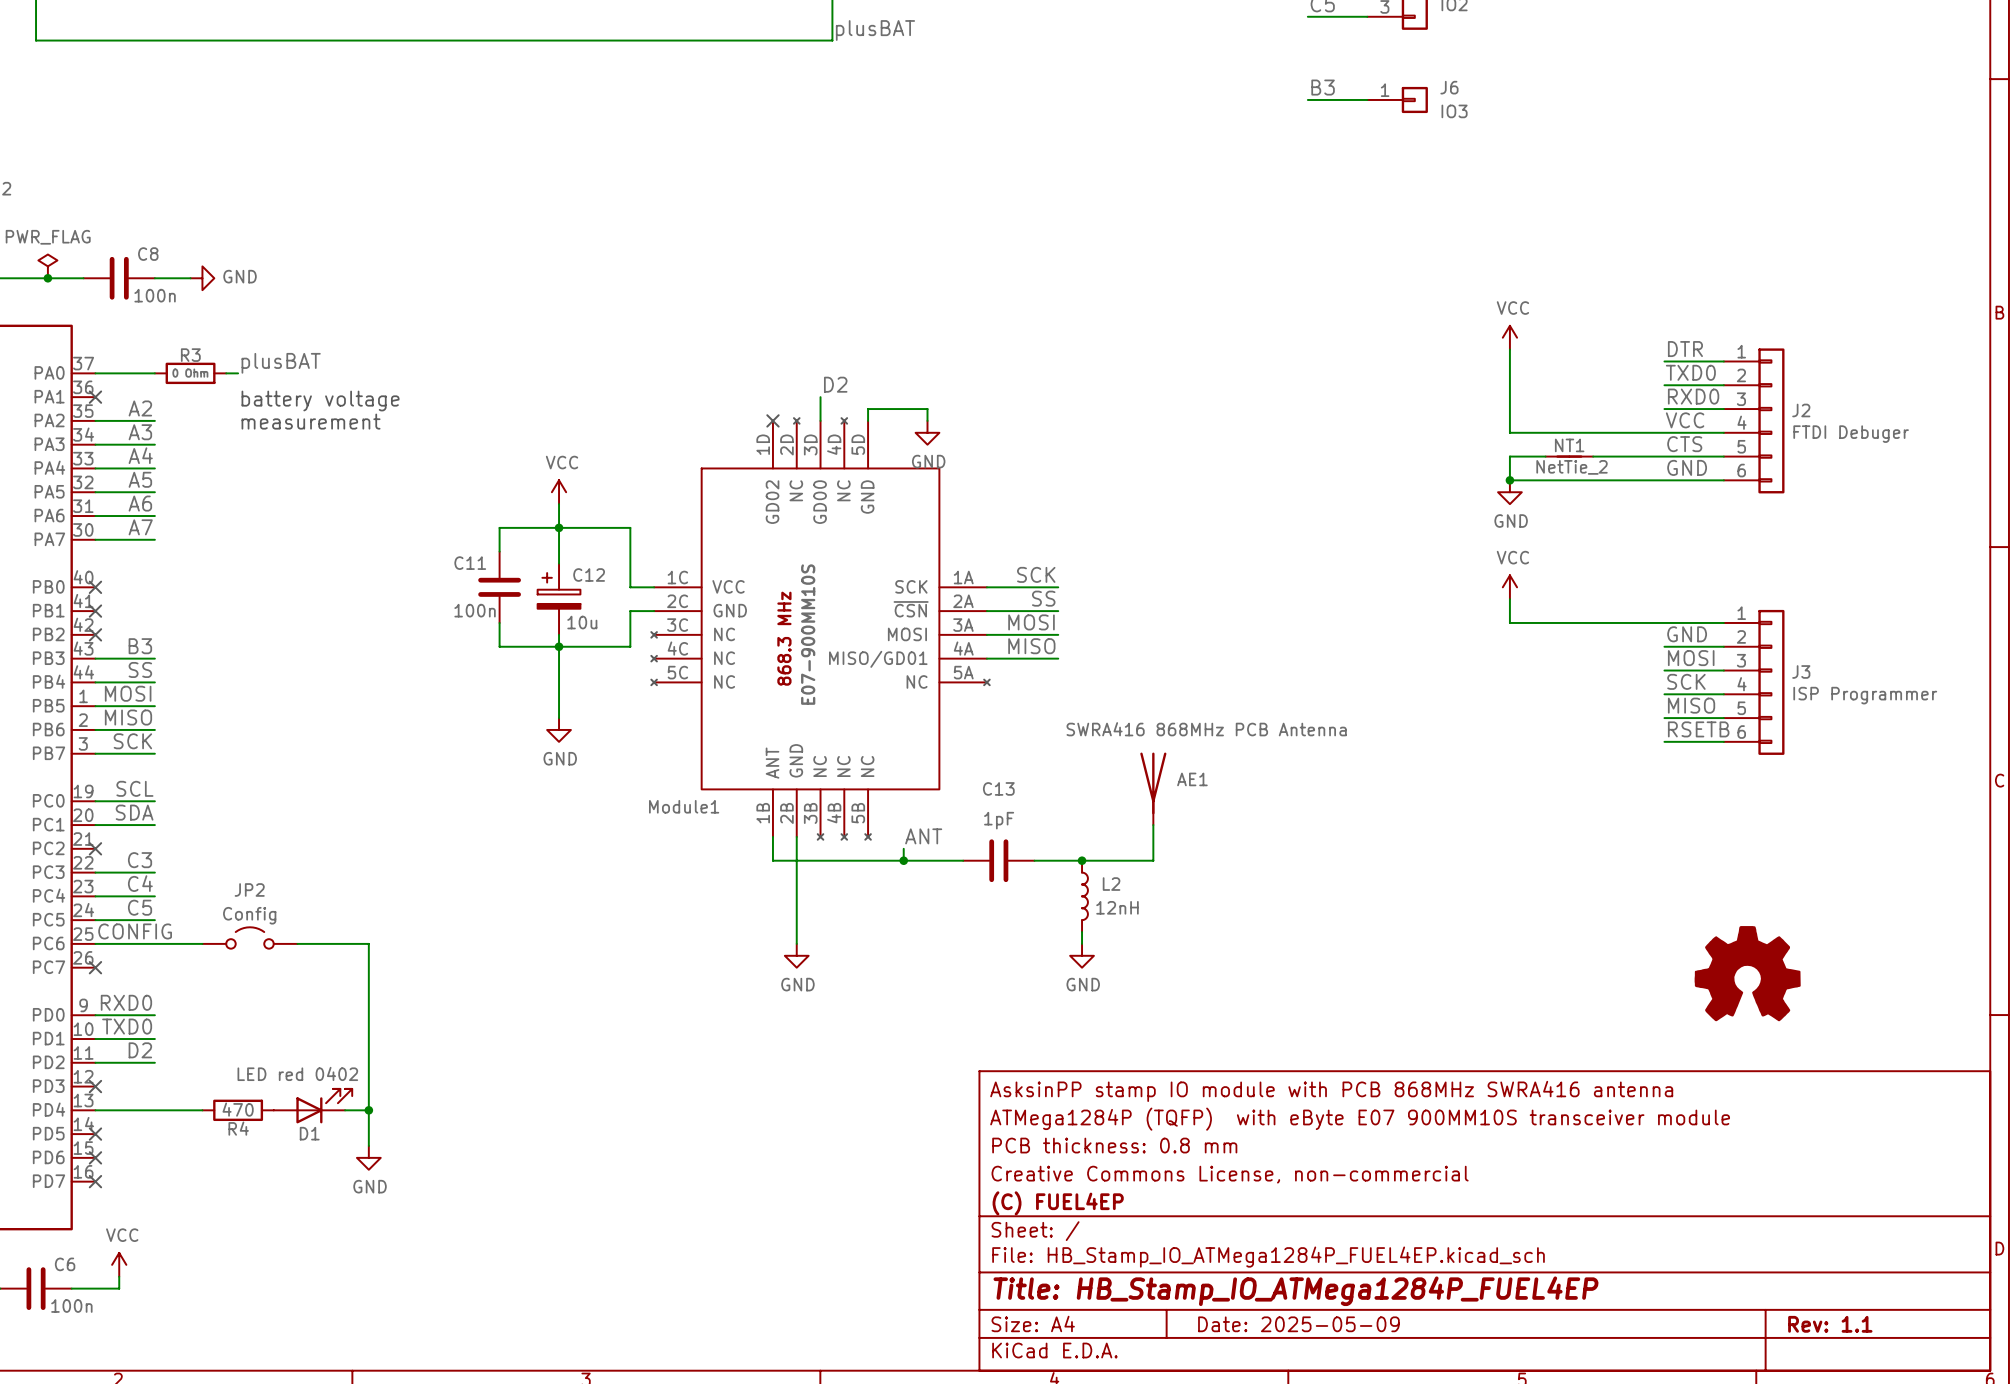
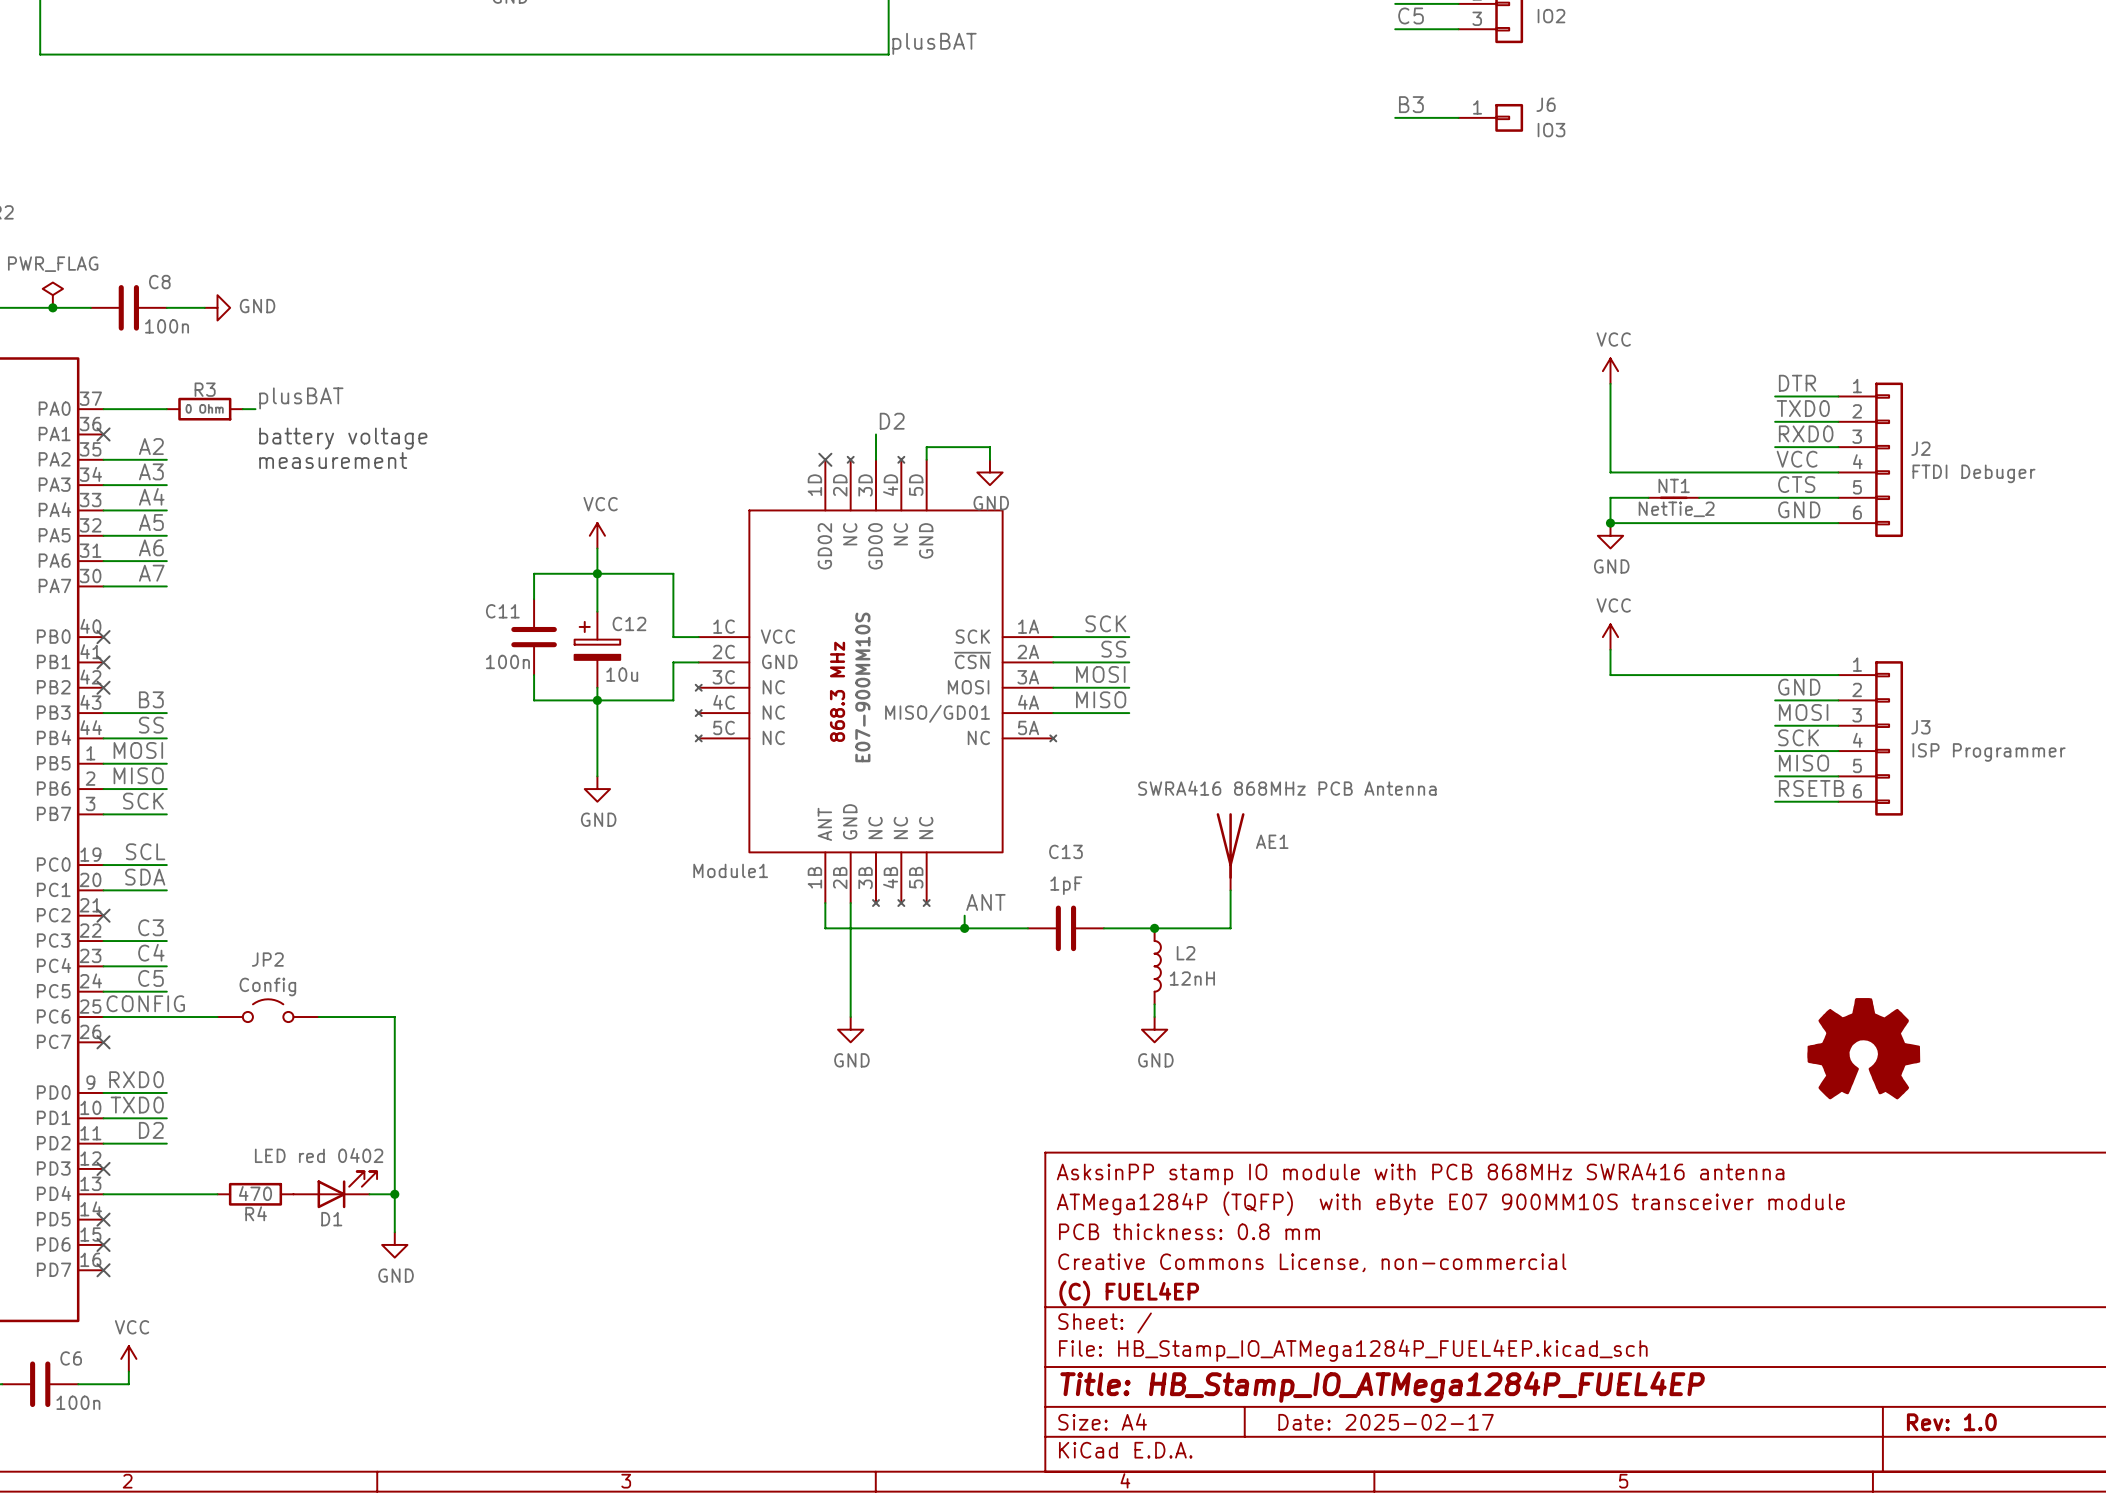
title block: Date: 2025-05-09 (1298, 1324) -> Date: 2025-02-17 (1386, 1422)
title block: Rev: 1.1 (1830, 1324) -> Rev: 1.0 (1951, 1422)

